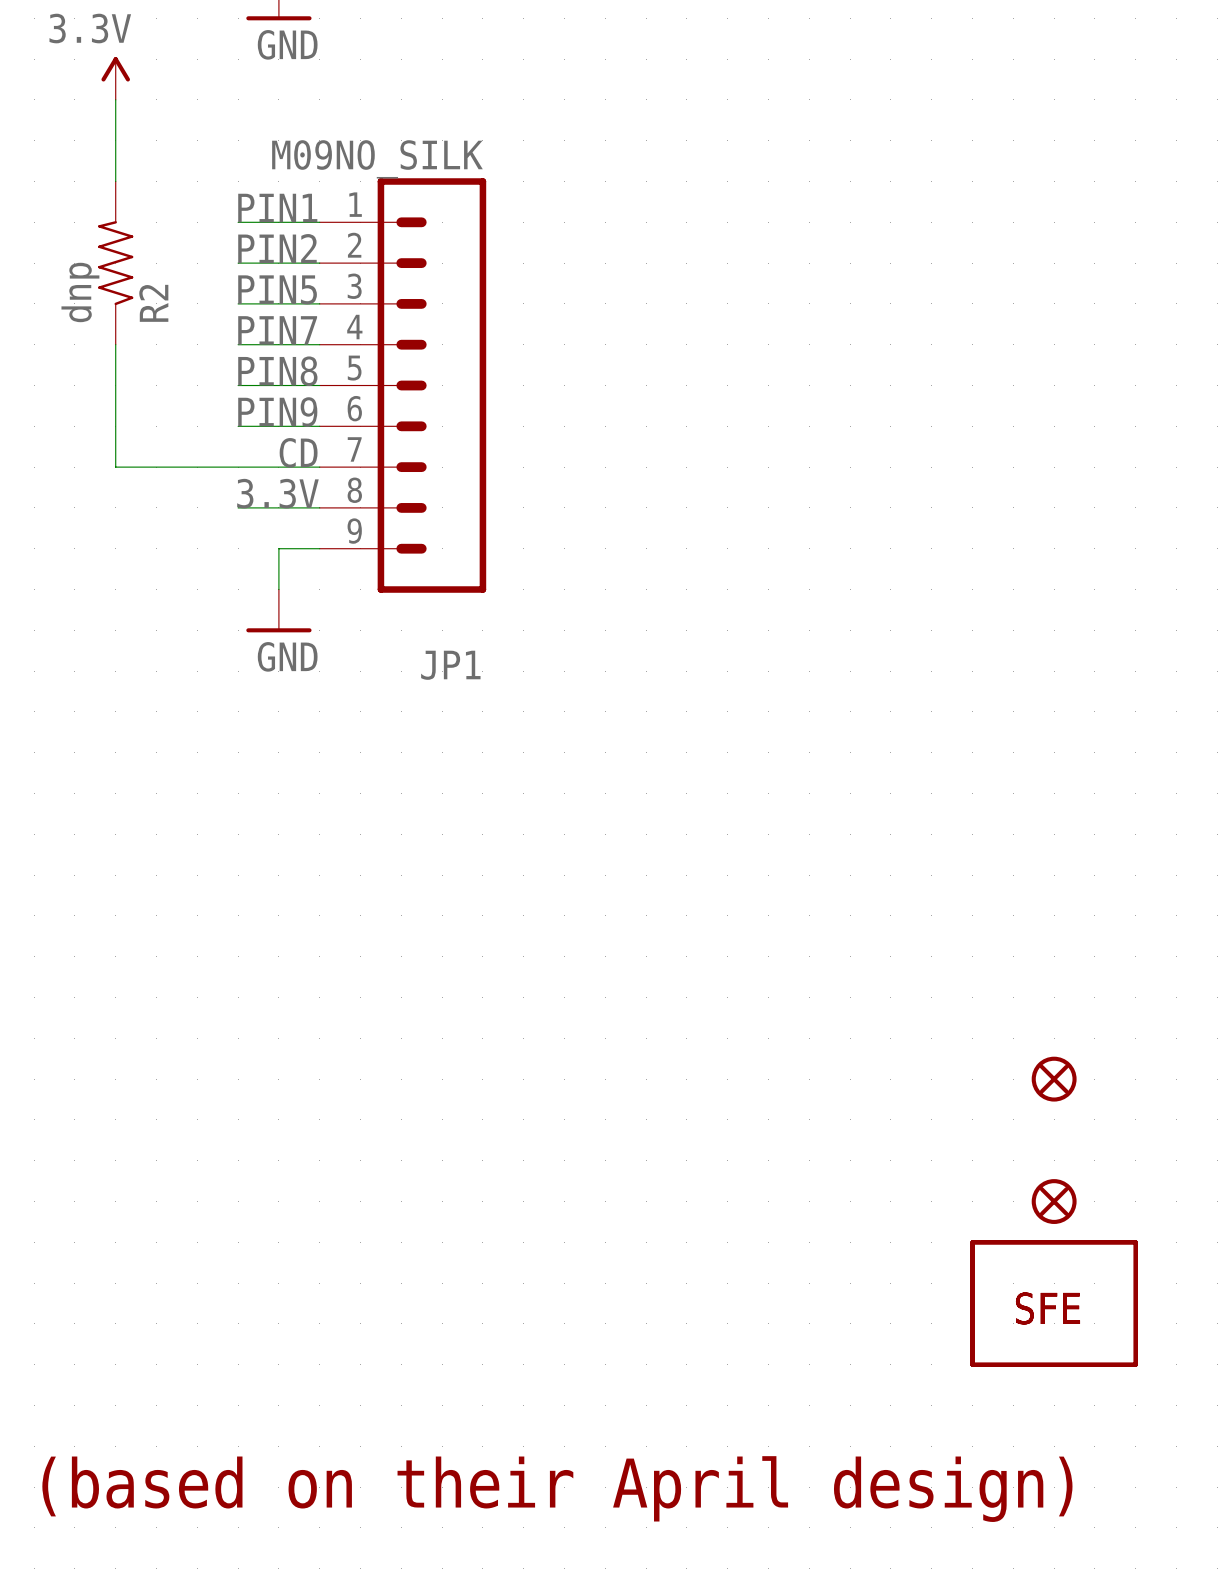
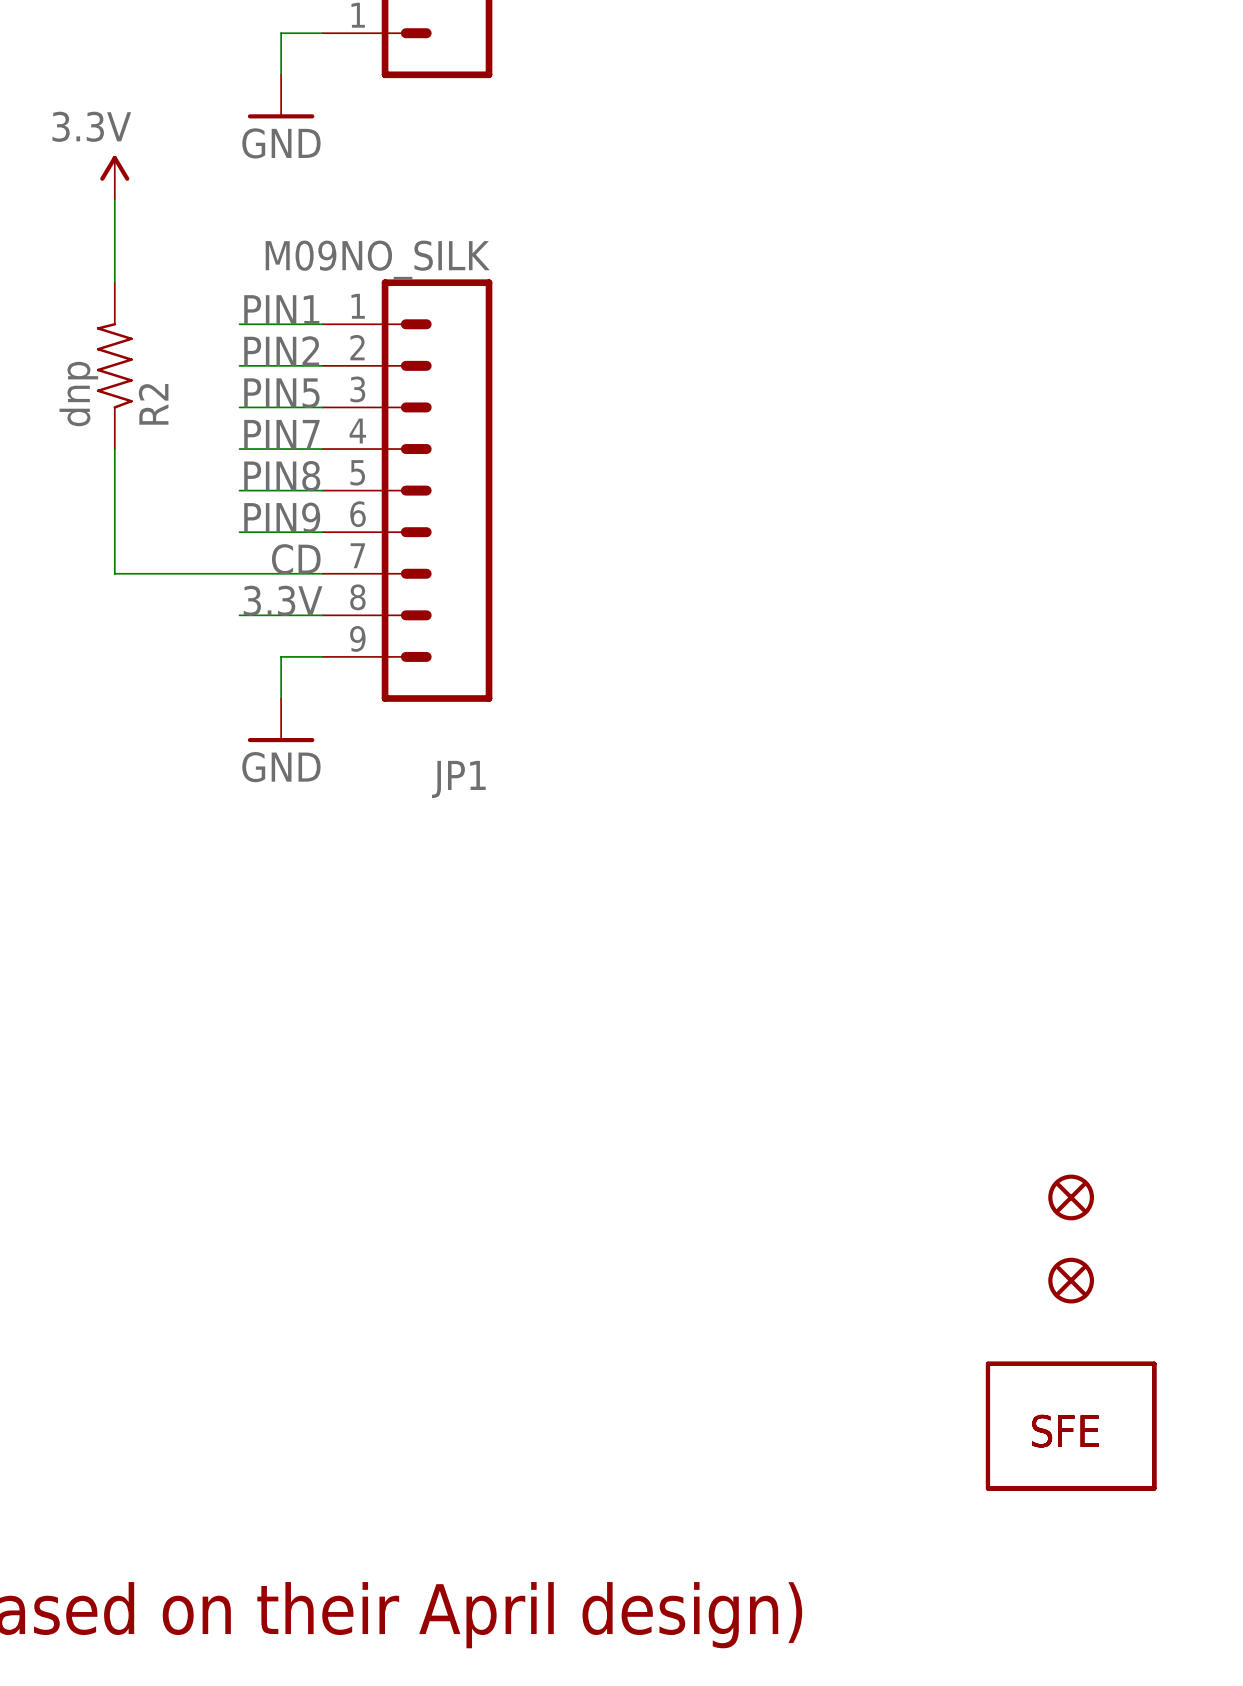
part position: (1054, 1201) -> (1071, 1280)

